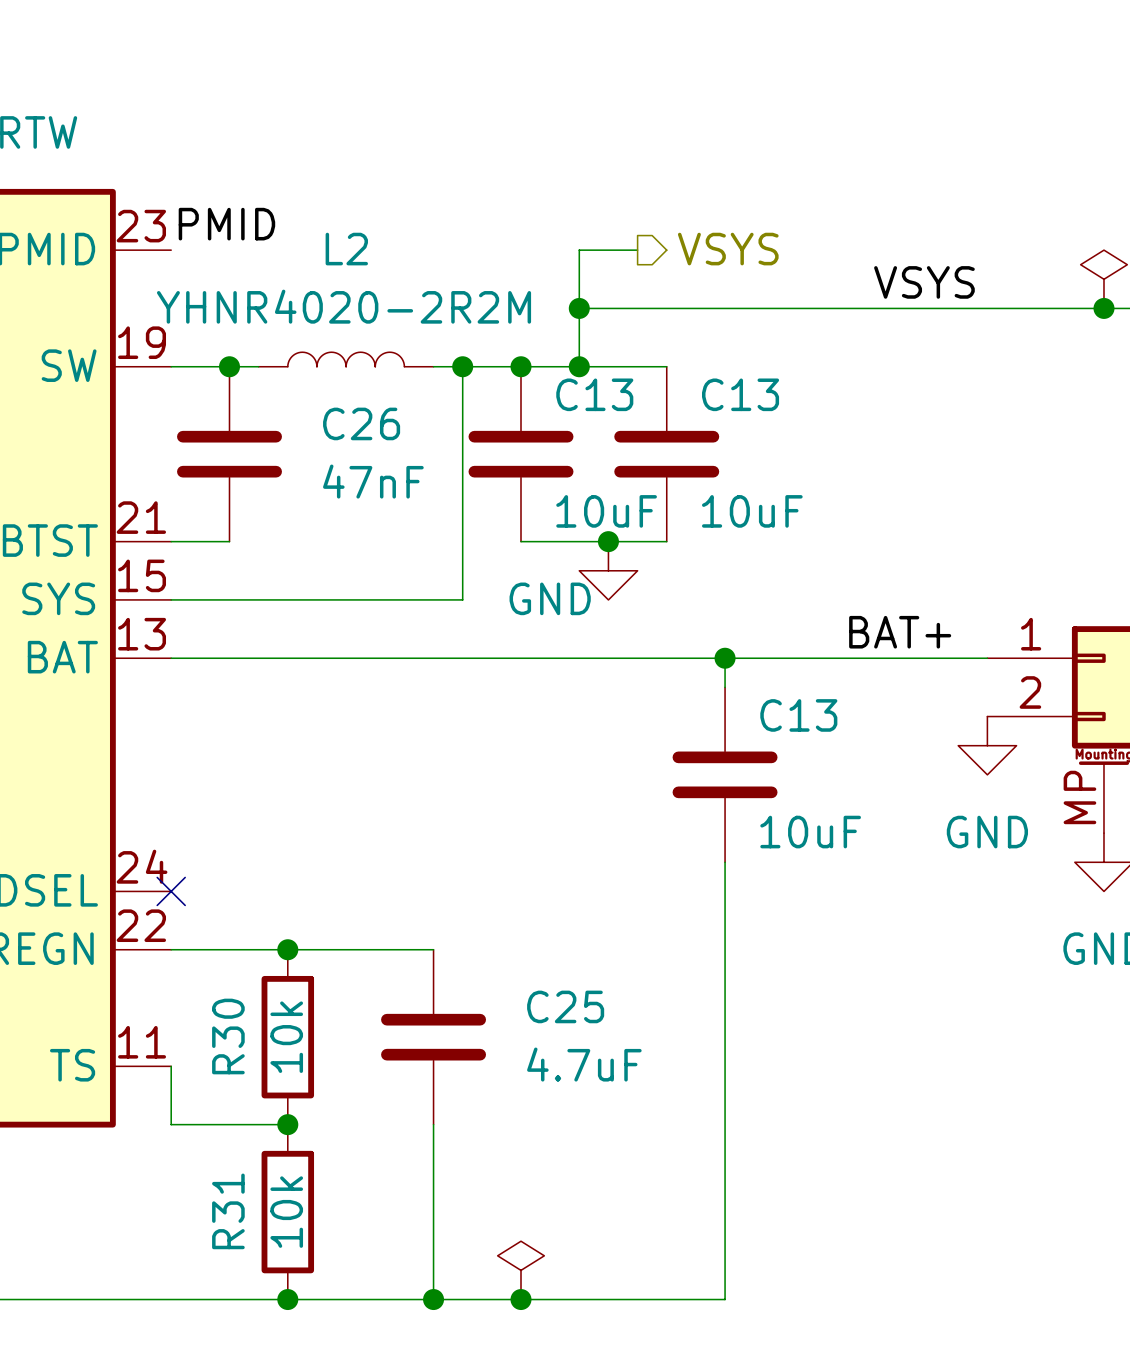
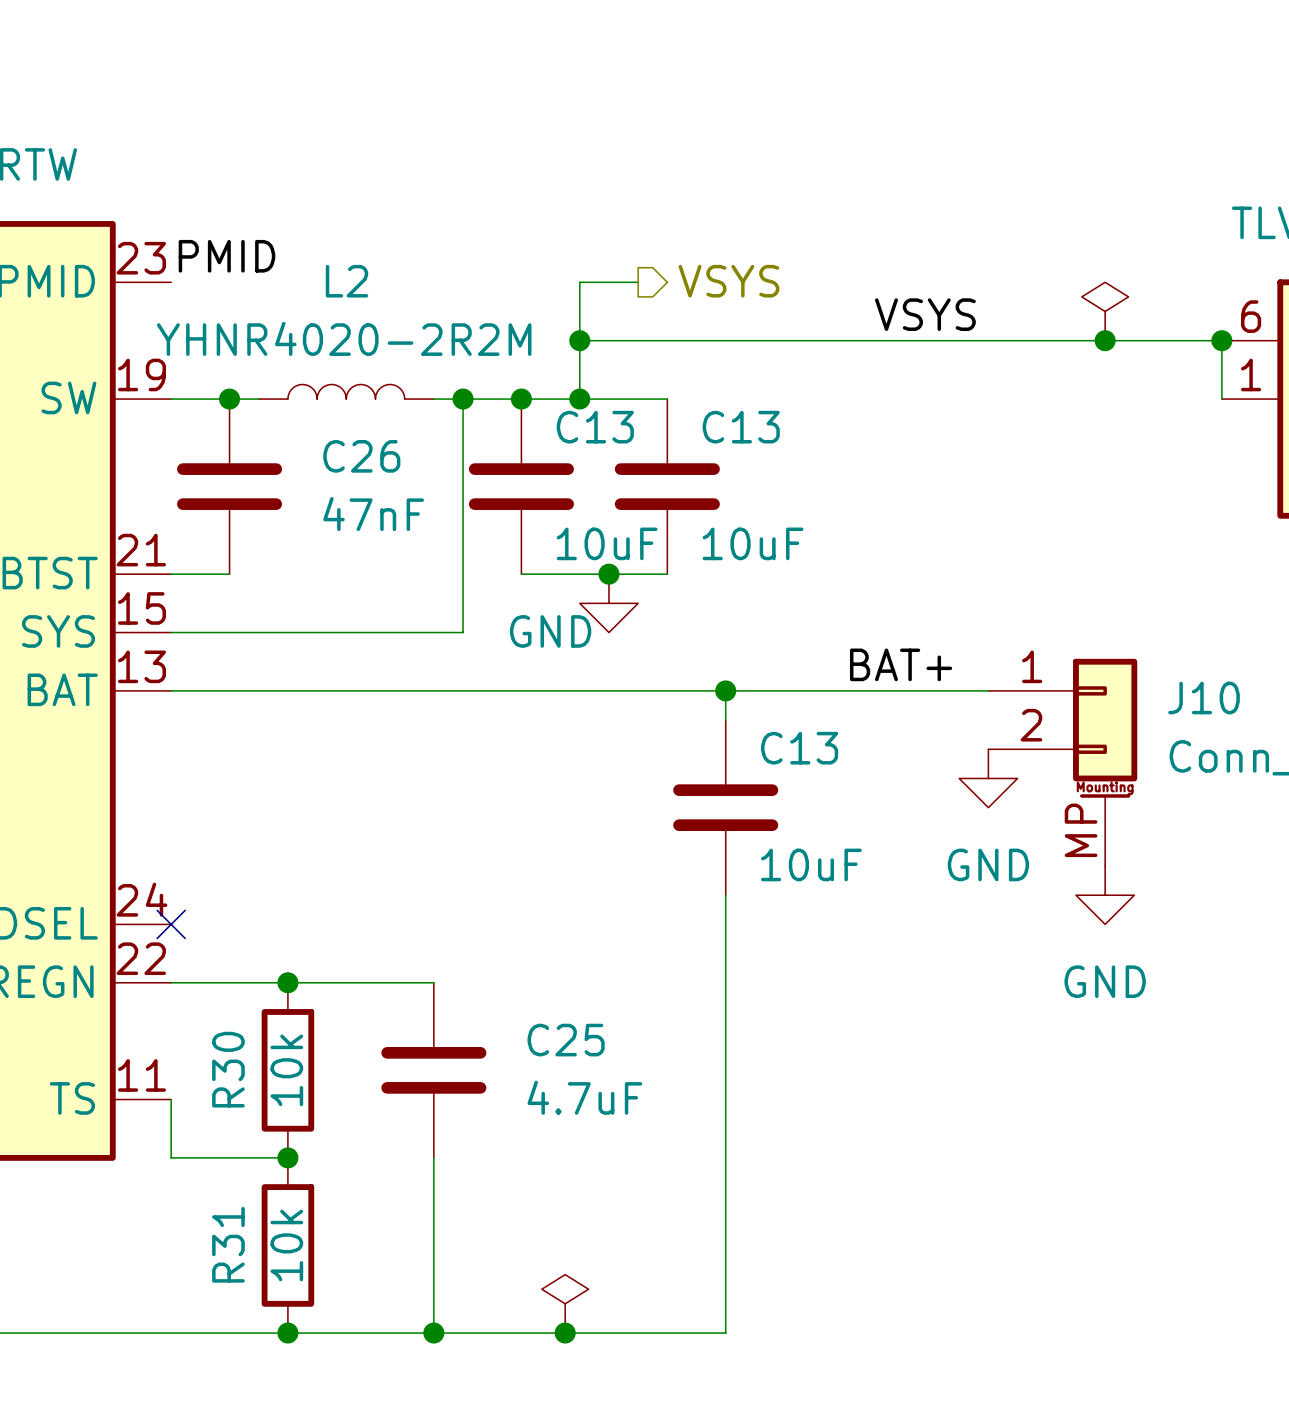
power symbol position: (520, 1270) -> (565, 1303)
junction position: (520, 1299) -> (565, 1333)

